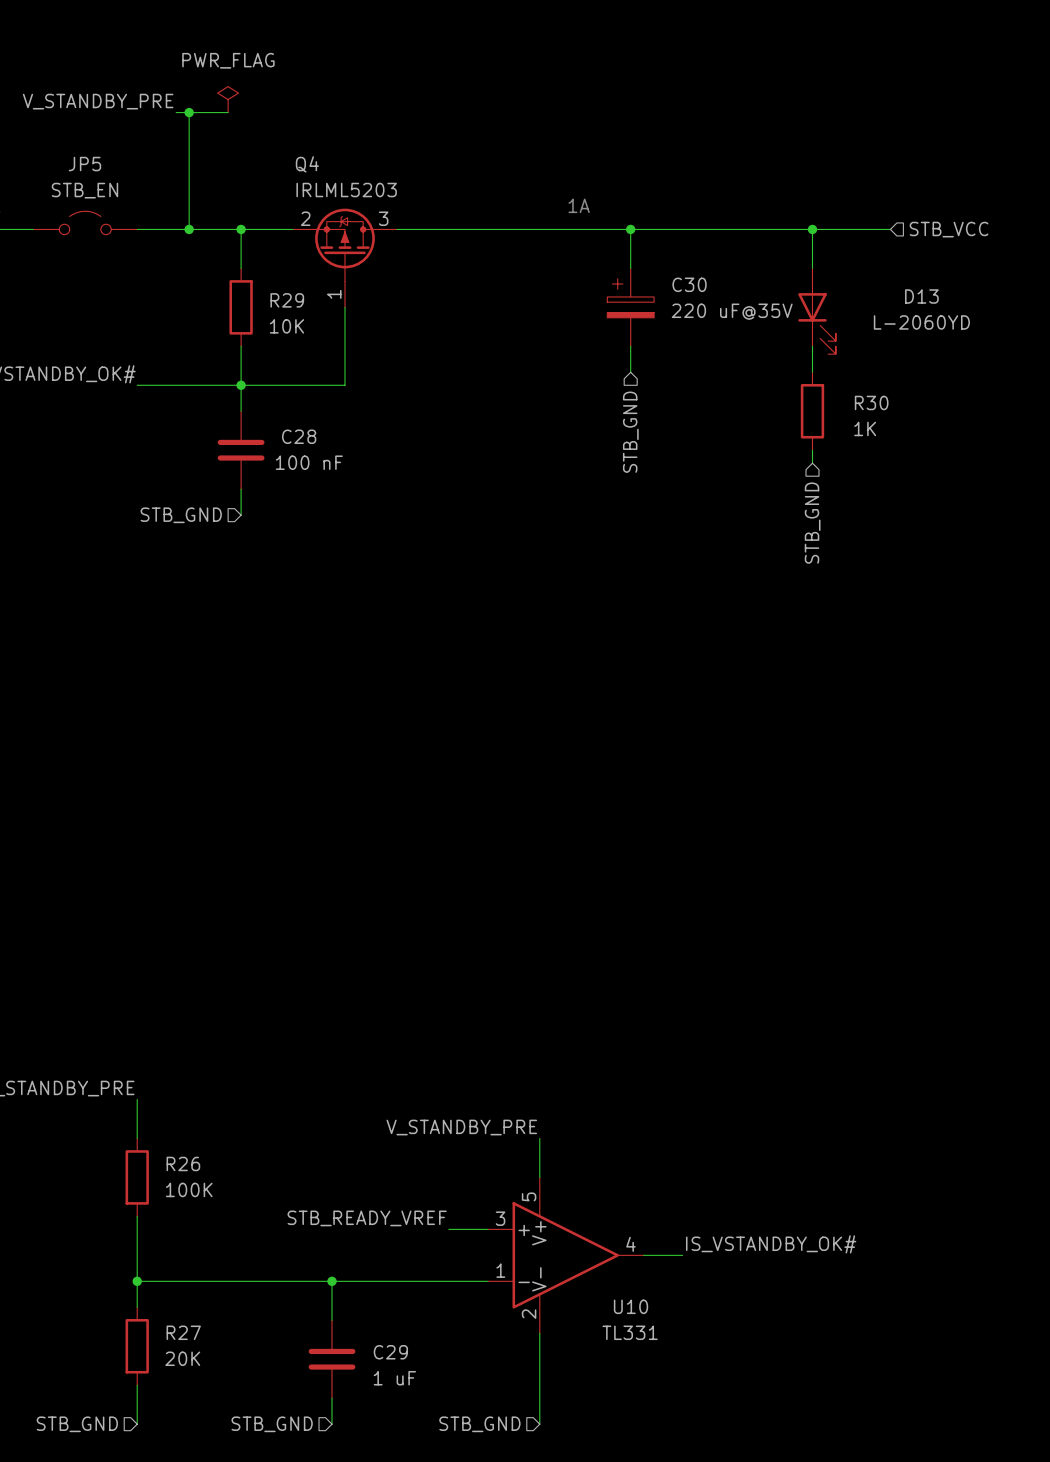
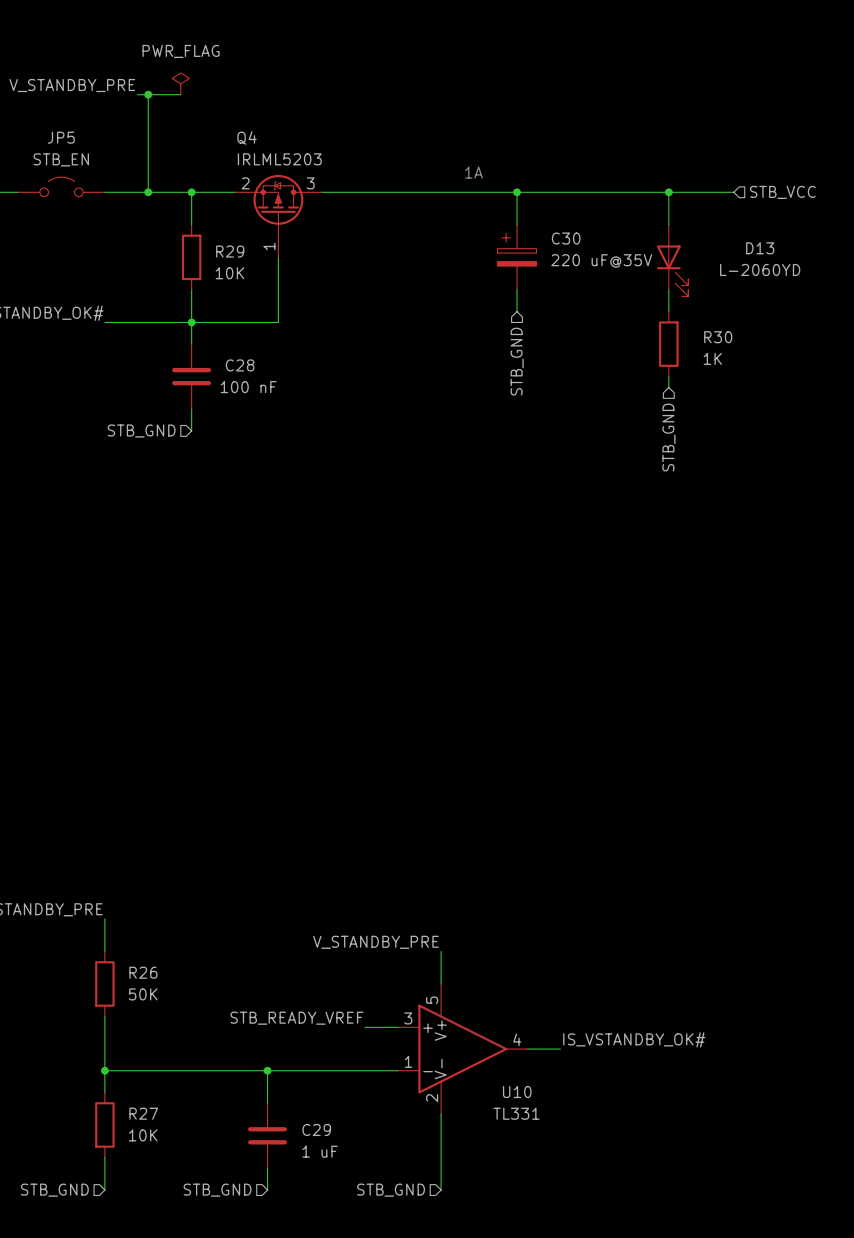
R26 value: 100K (189, 1189) -> 50K (143, 994)
R27 value: 20K (182, 1358) -> 10K (143, 1135)

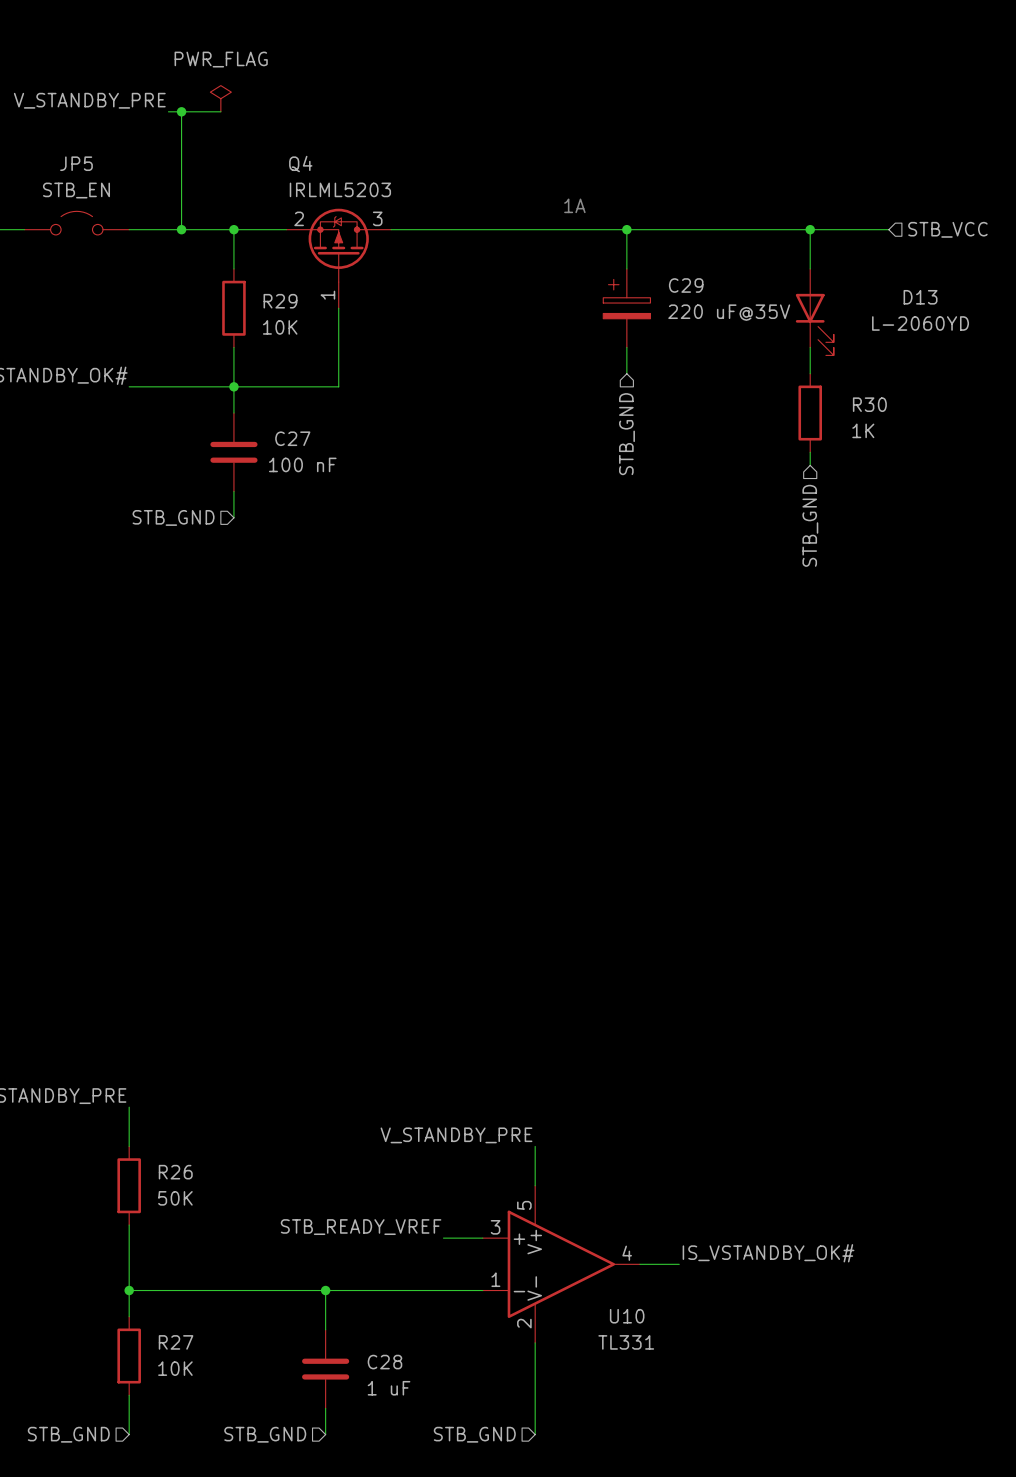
C30 name: C30 (566, 238) -> C29 (686, 285)
C28 name: C28 (240, 365) -> C27 (292, 438)
C29 name: C29 (316, 1129) -> C28 (384, 1362)

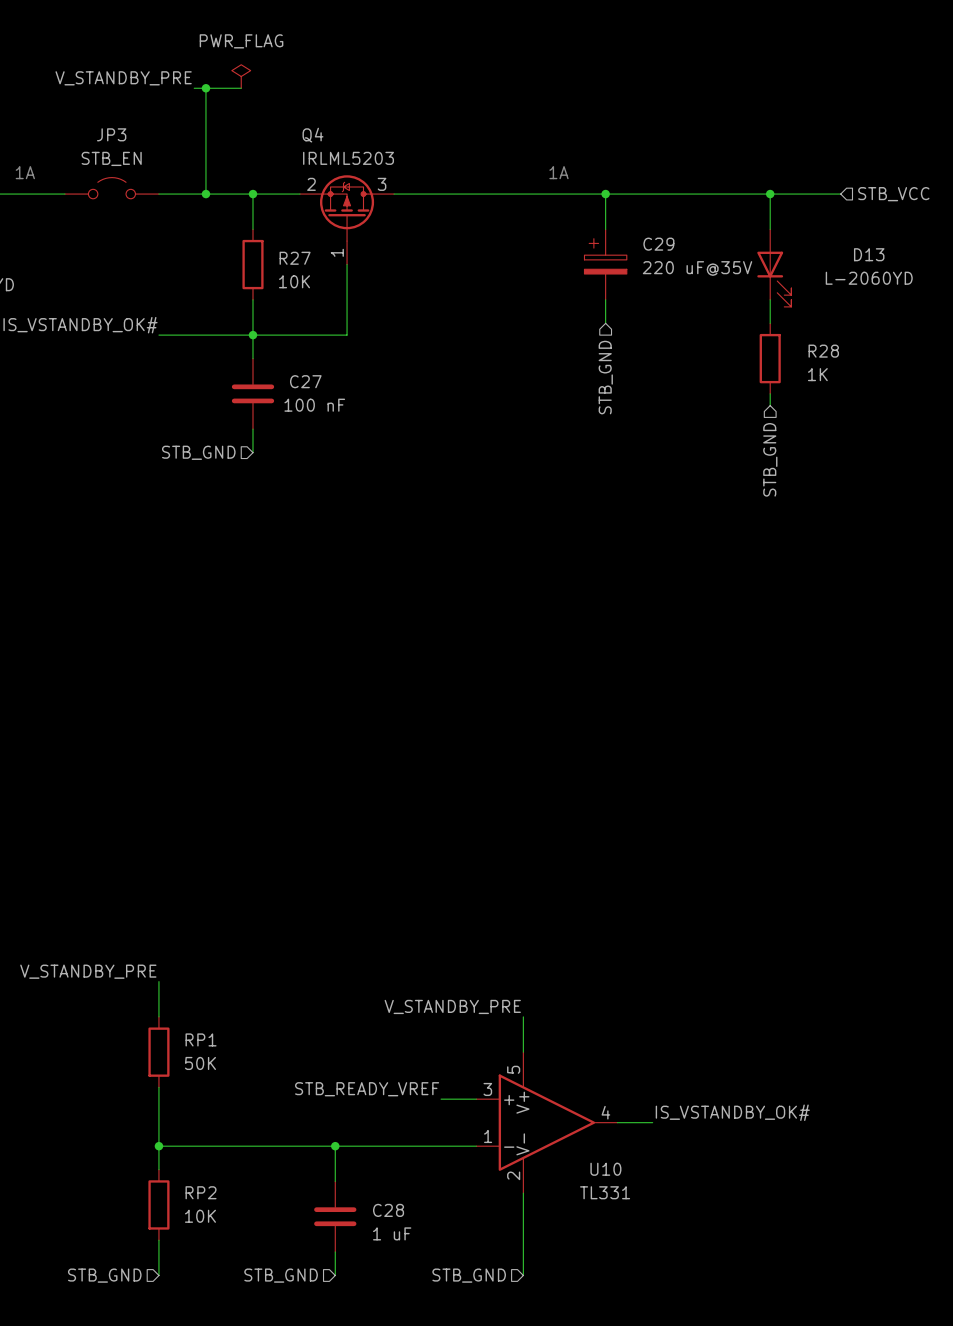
JP5 name: JP5 (76, 163) -> JP3 (111, 134)
R29 name: R29 (280, 301) -> R27 (295, 258)
R30 name: R30 (869, 404) -> R28 (823, 351)
R26 name: R26 (175, 1172) -> RP1 (201, 1039)
R27 name: R27 (176, 1342) -> RP2 (201, 1192)

